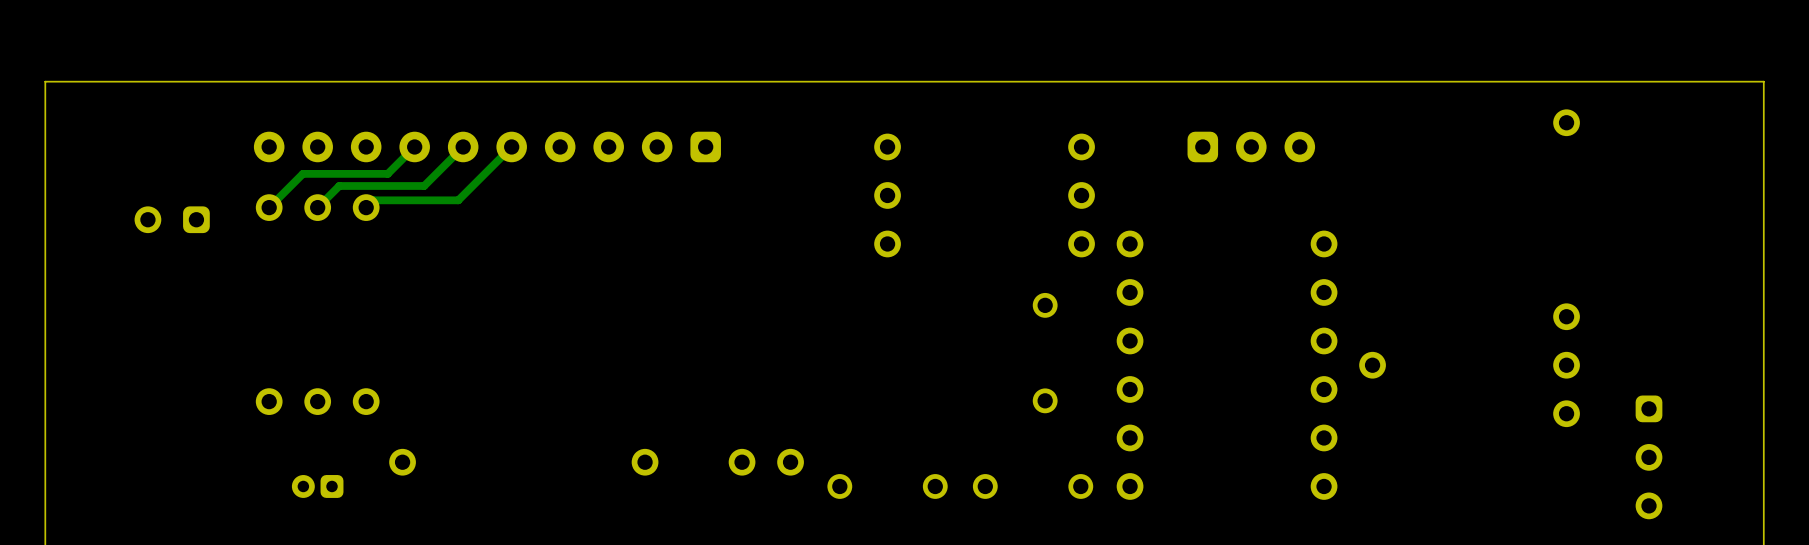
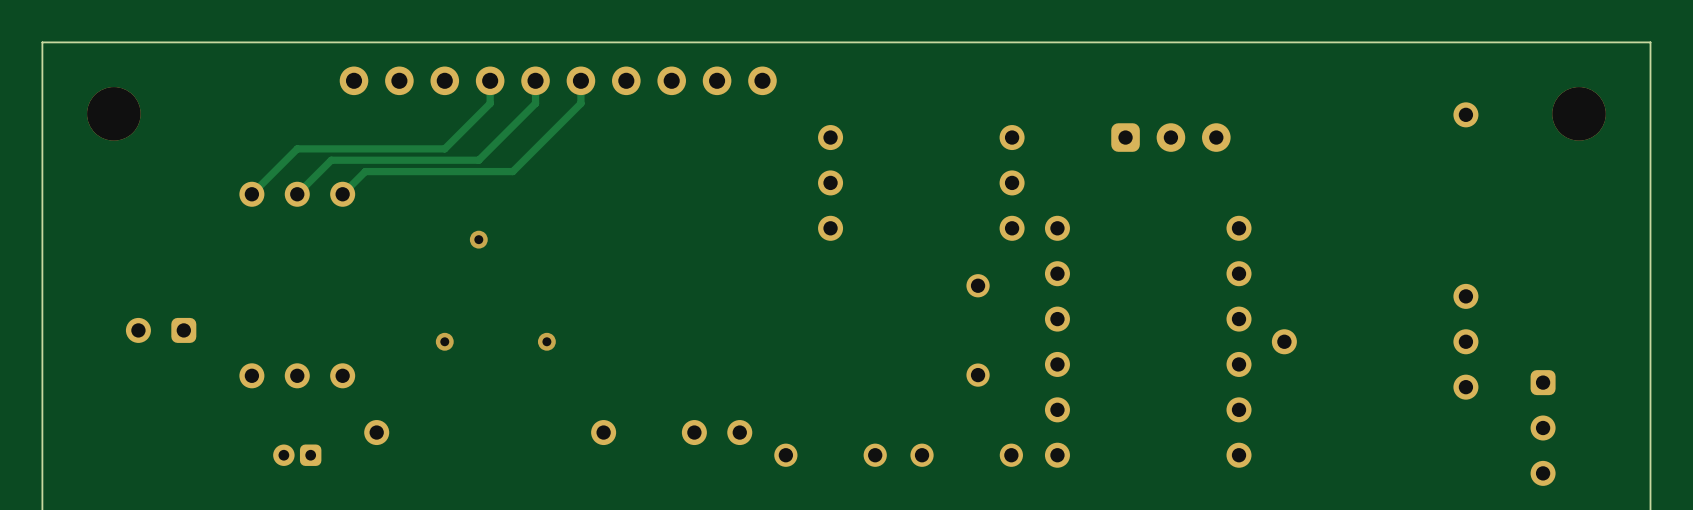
board edge: (1763, 81) (45, 81) -> (1650, 76) (1650, 42) (42, 42) (42, 76)
part: none -> (558, 80)
part: none -> (113, 113)
part: none -> (1579, 113)
track: (414, 146) (387, 173) (302, 173) -> (490, 80) (490, 103) (444, 148) (297, 148) (283, 162)
track: (463, 146) (424, 185) (339, 185) -> (535, 80) (535, 103) (478, 160) (331, 160) (317, 174)
part: (487, 146) -> none
track: (511, 146) (458, 200) (373, 200) -> (580, 80) (580, 103) (512, 171) (365, 171) (349, 187)
part position: (172, 219) -> (161, 330)
via: none -> (478, 239)
via: none -> (444, 341)
via: none -> (546, 341)

